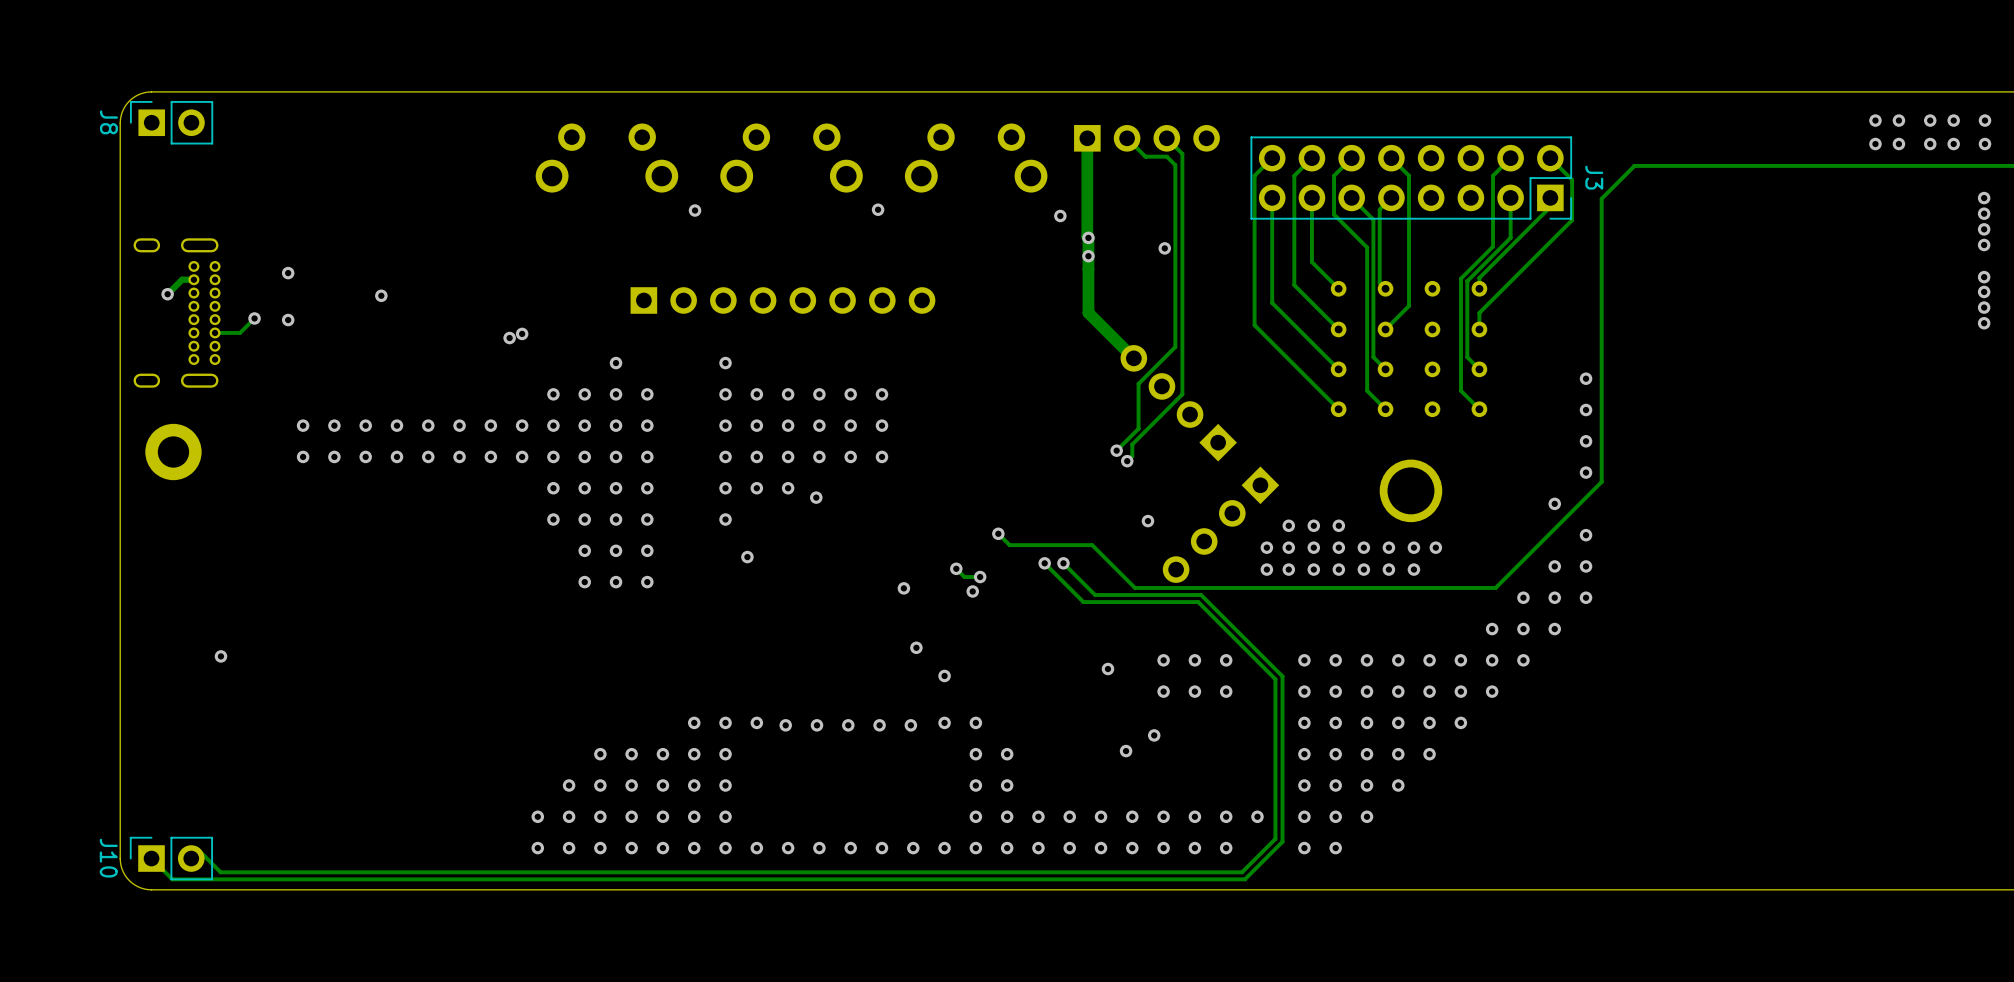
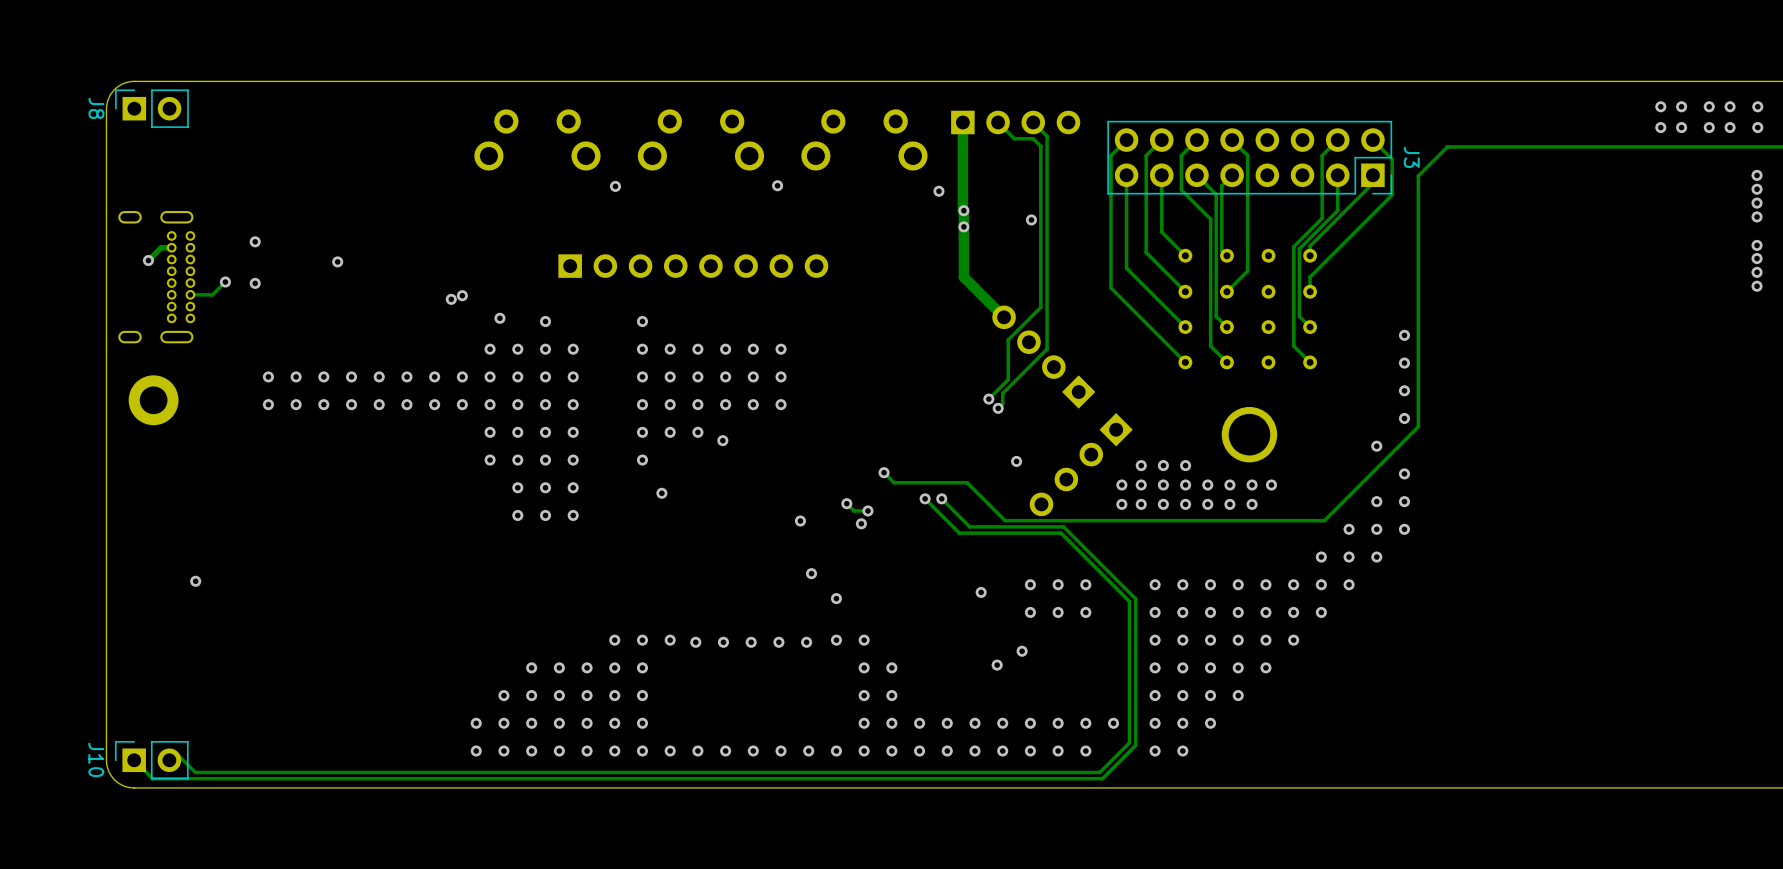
via: none -> (499, 318)

